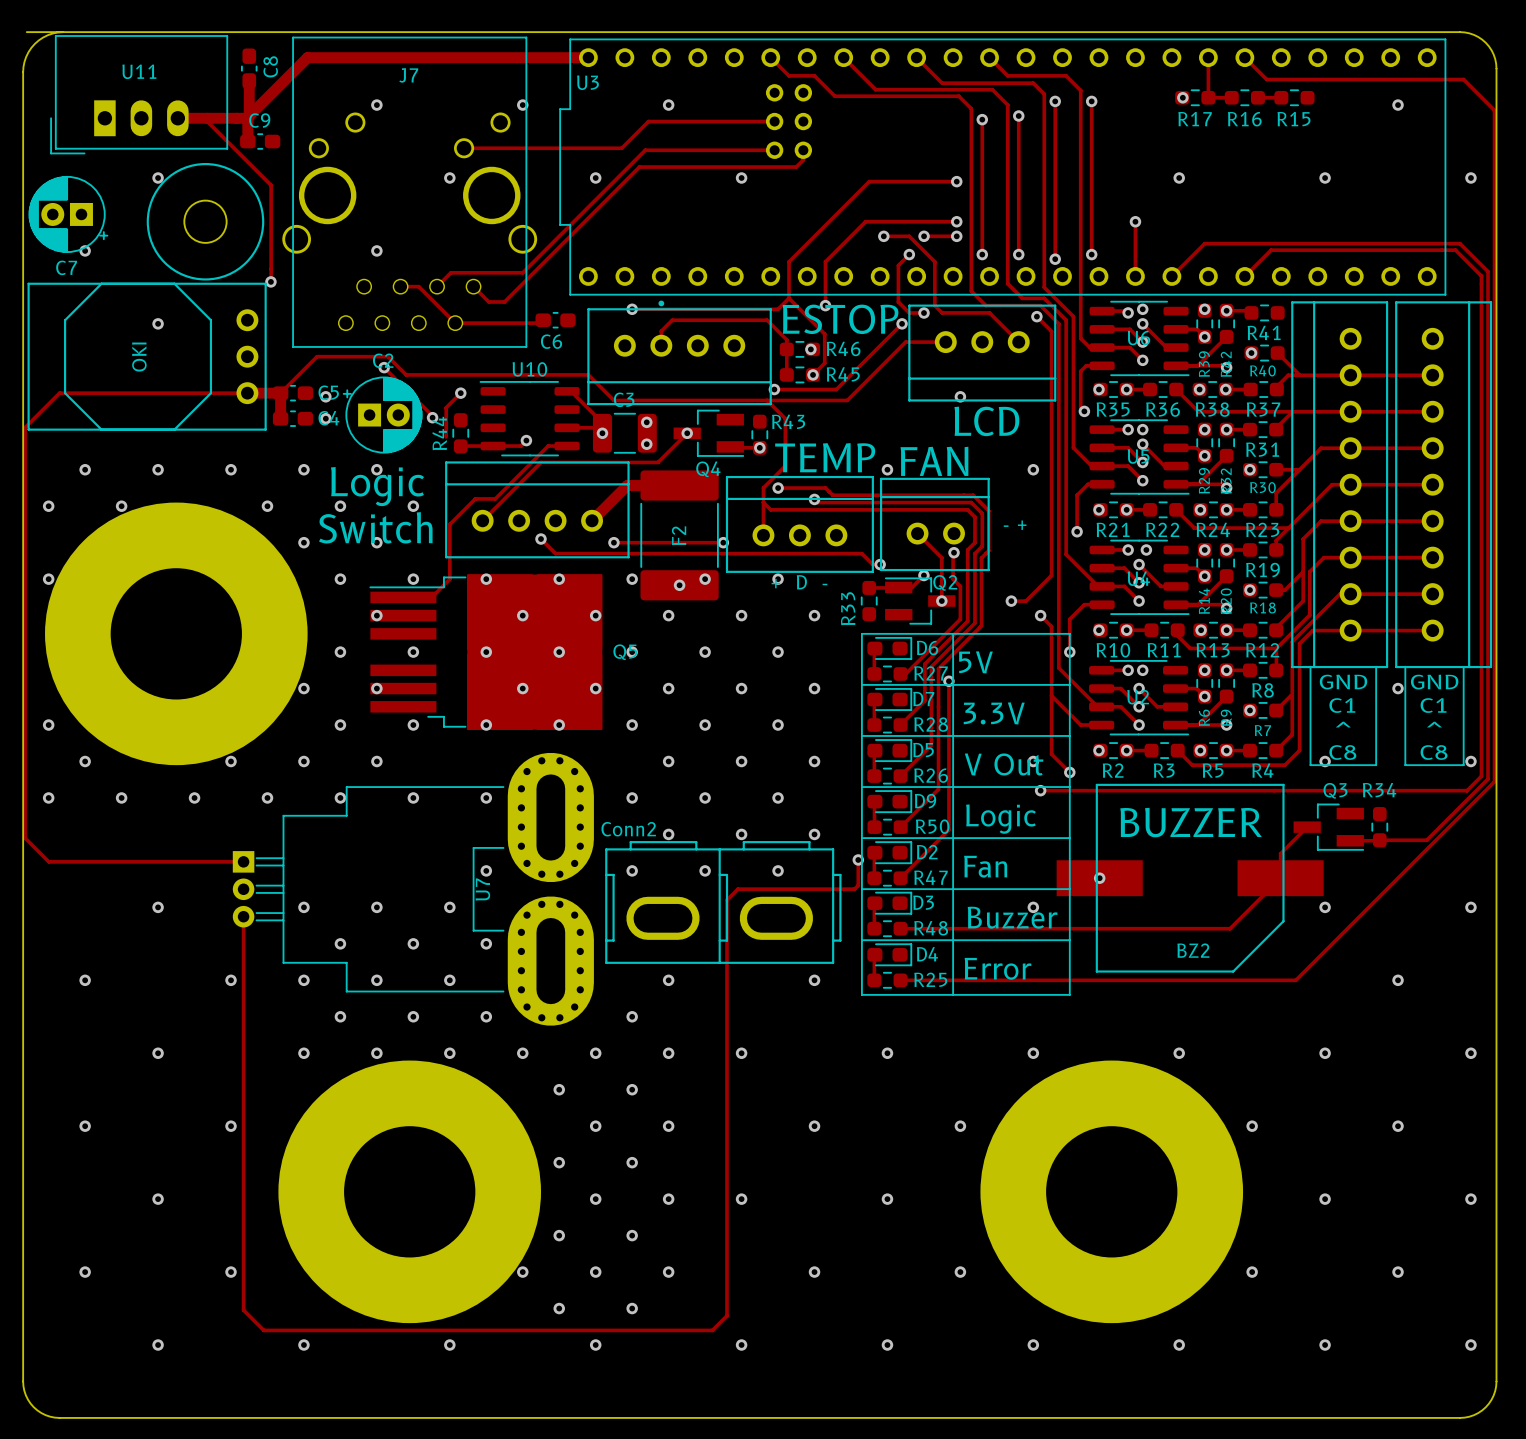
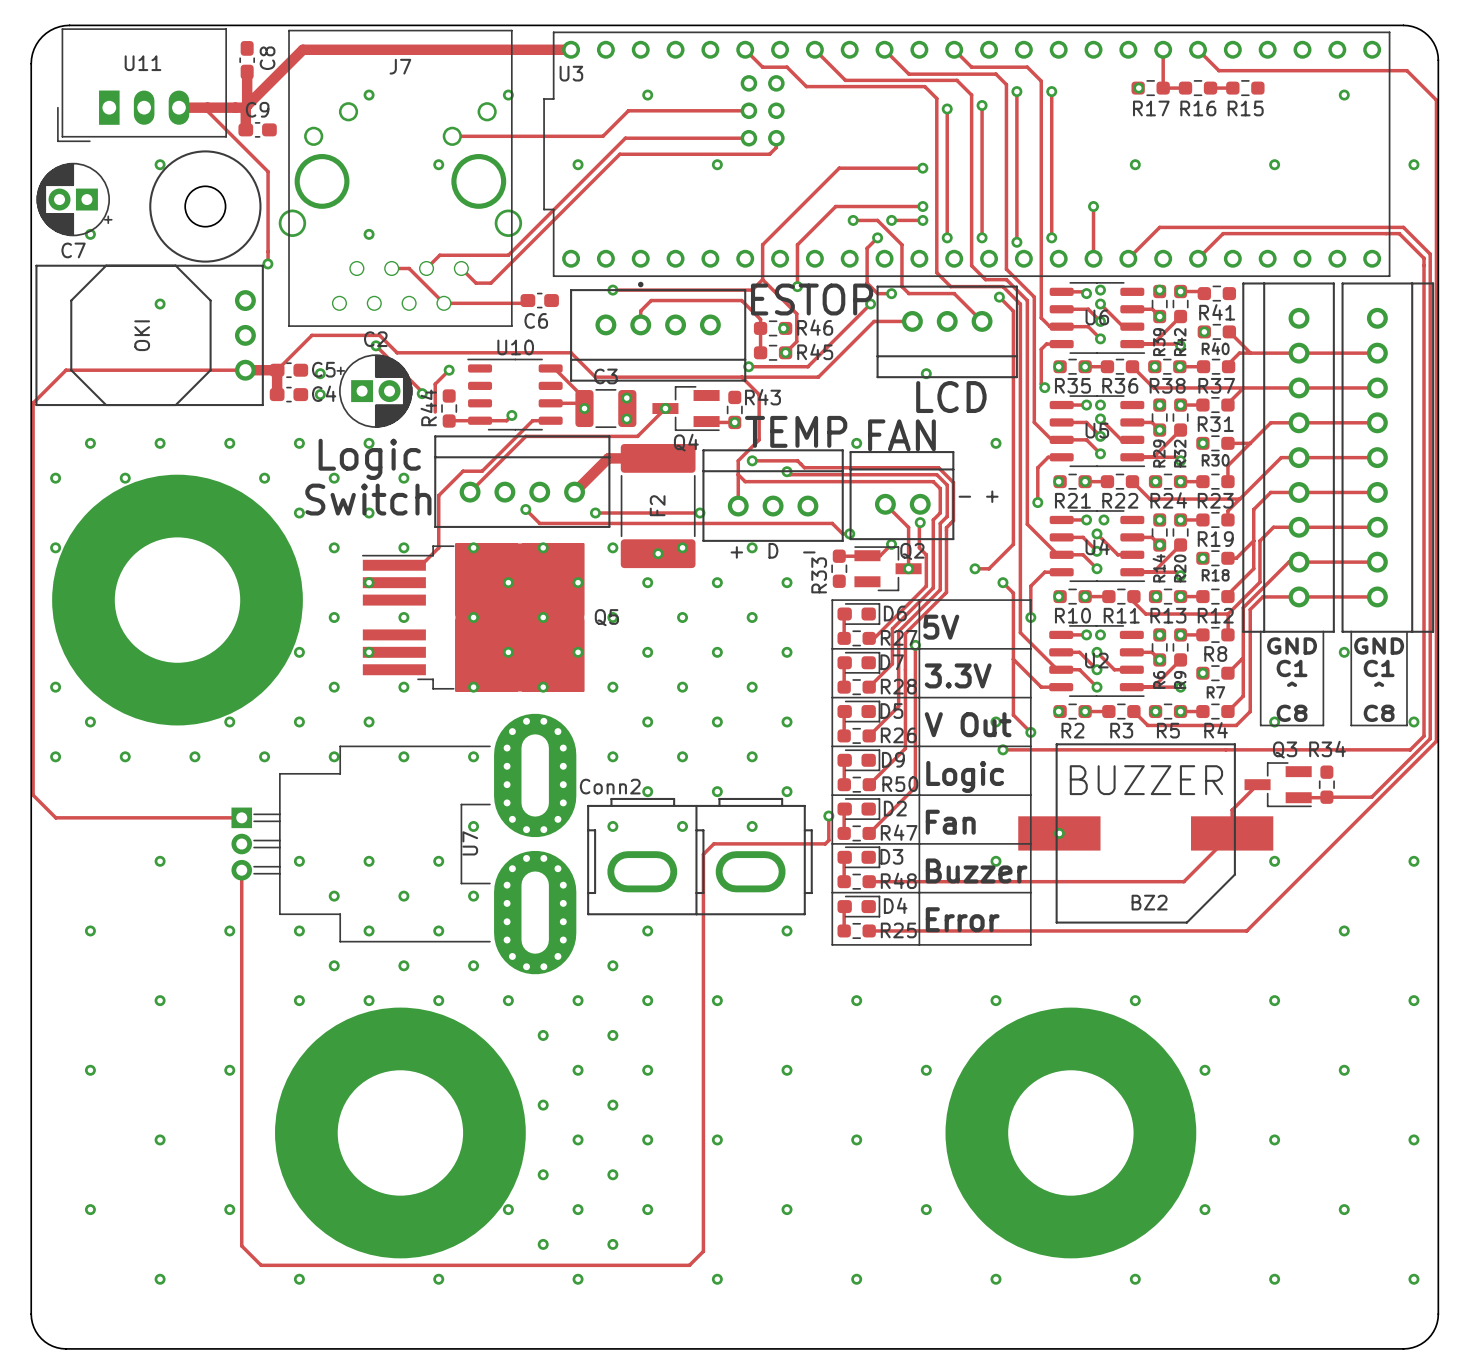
board edge: (26, 32) (63, 32) -> none

